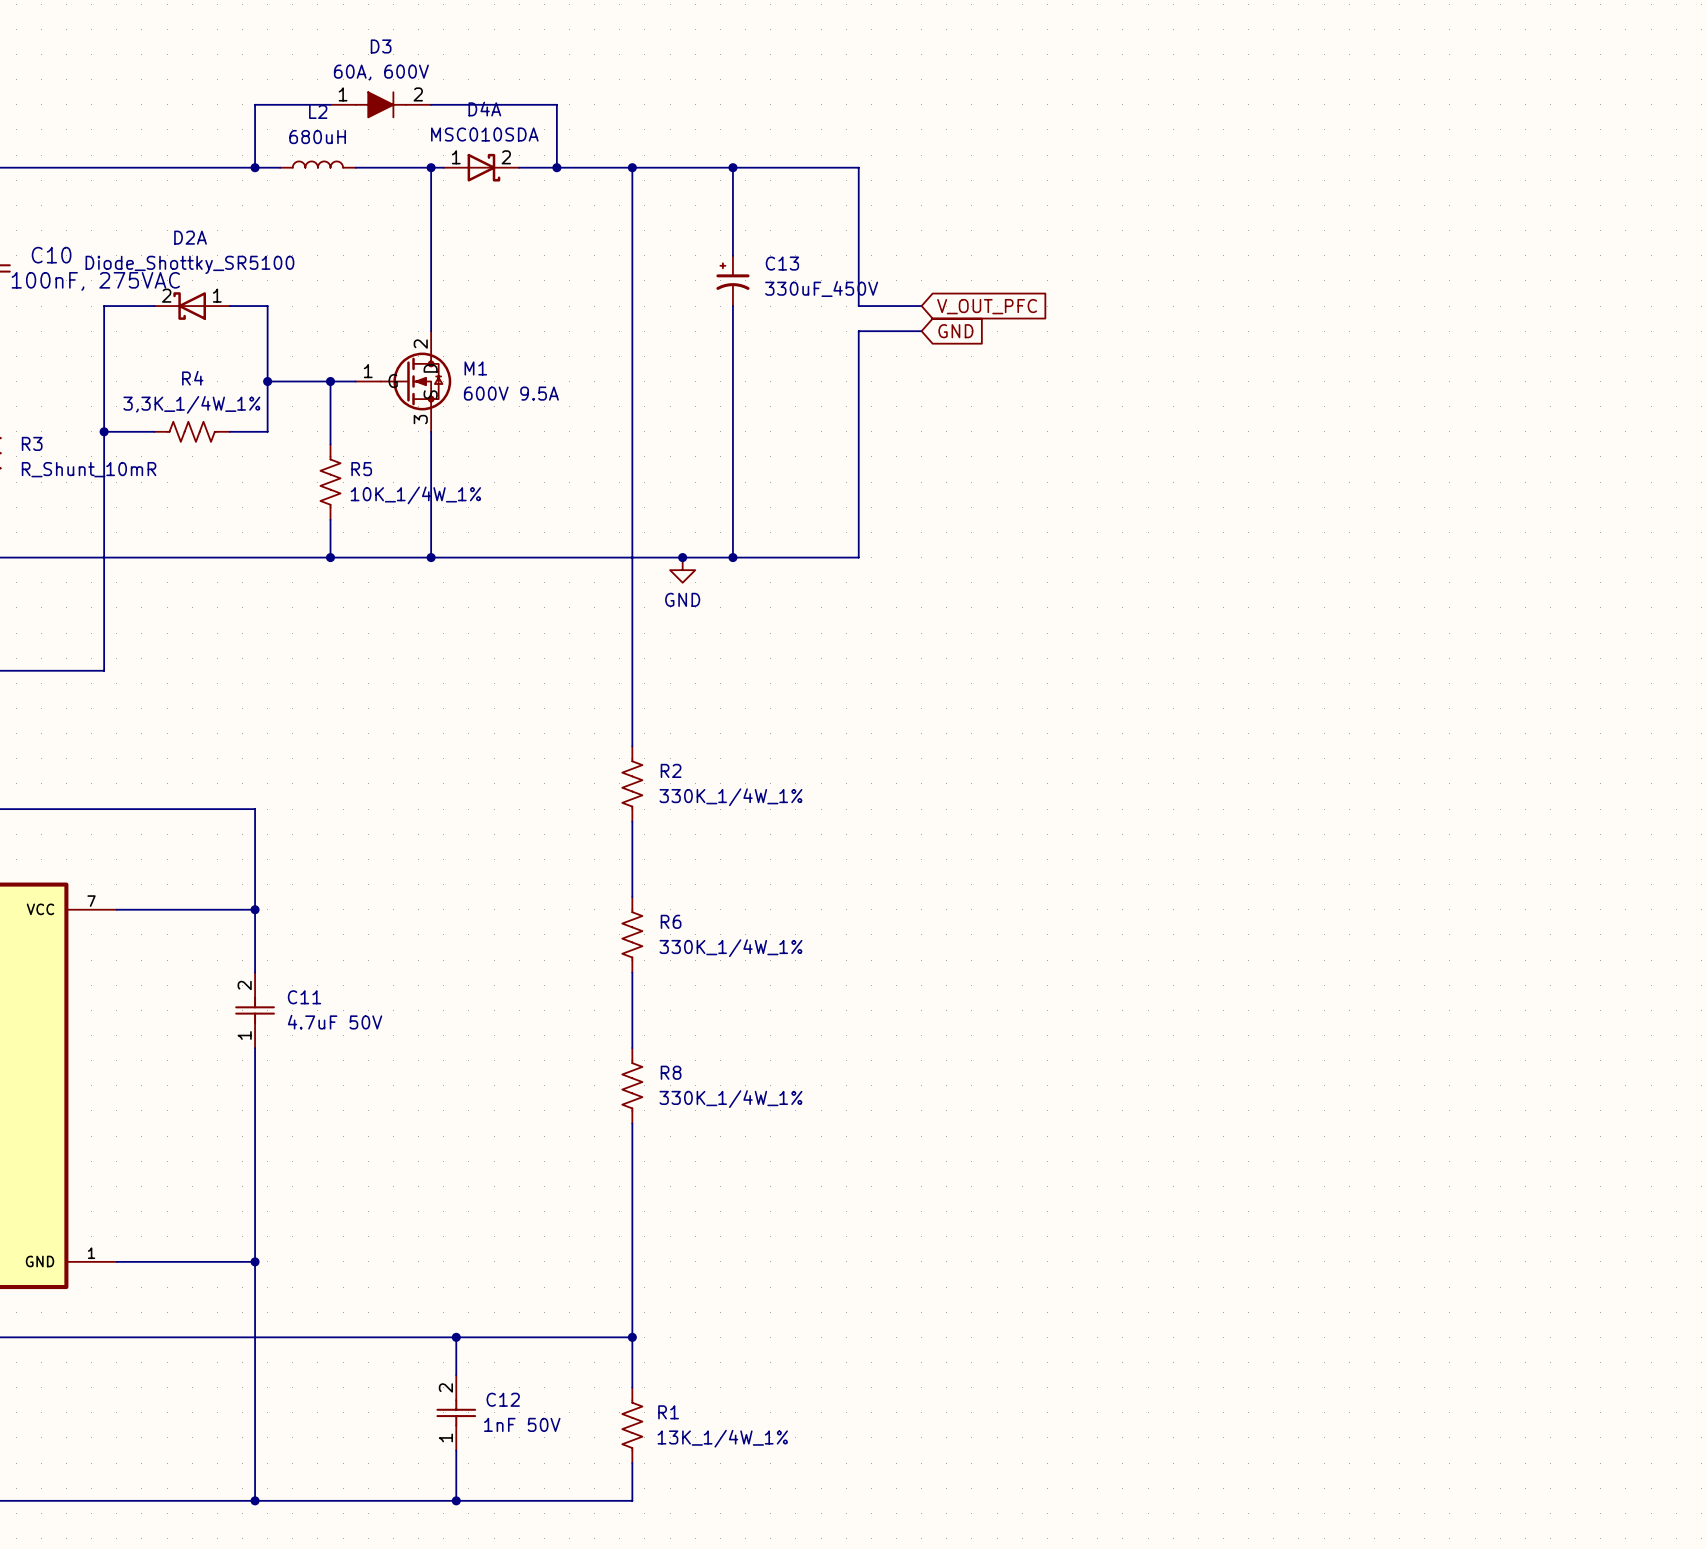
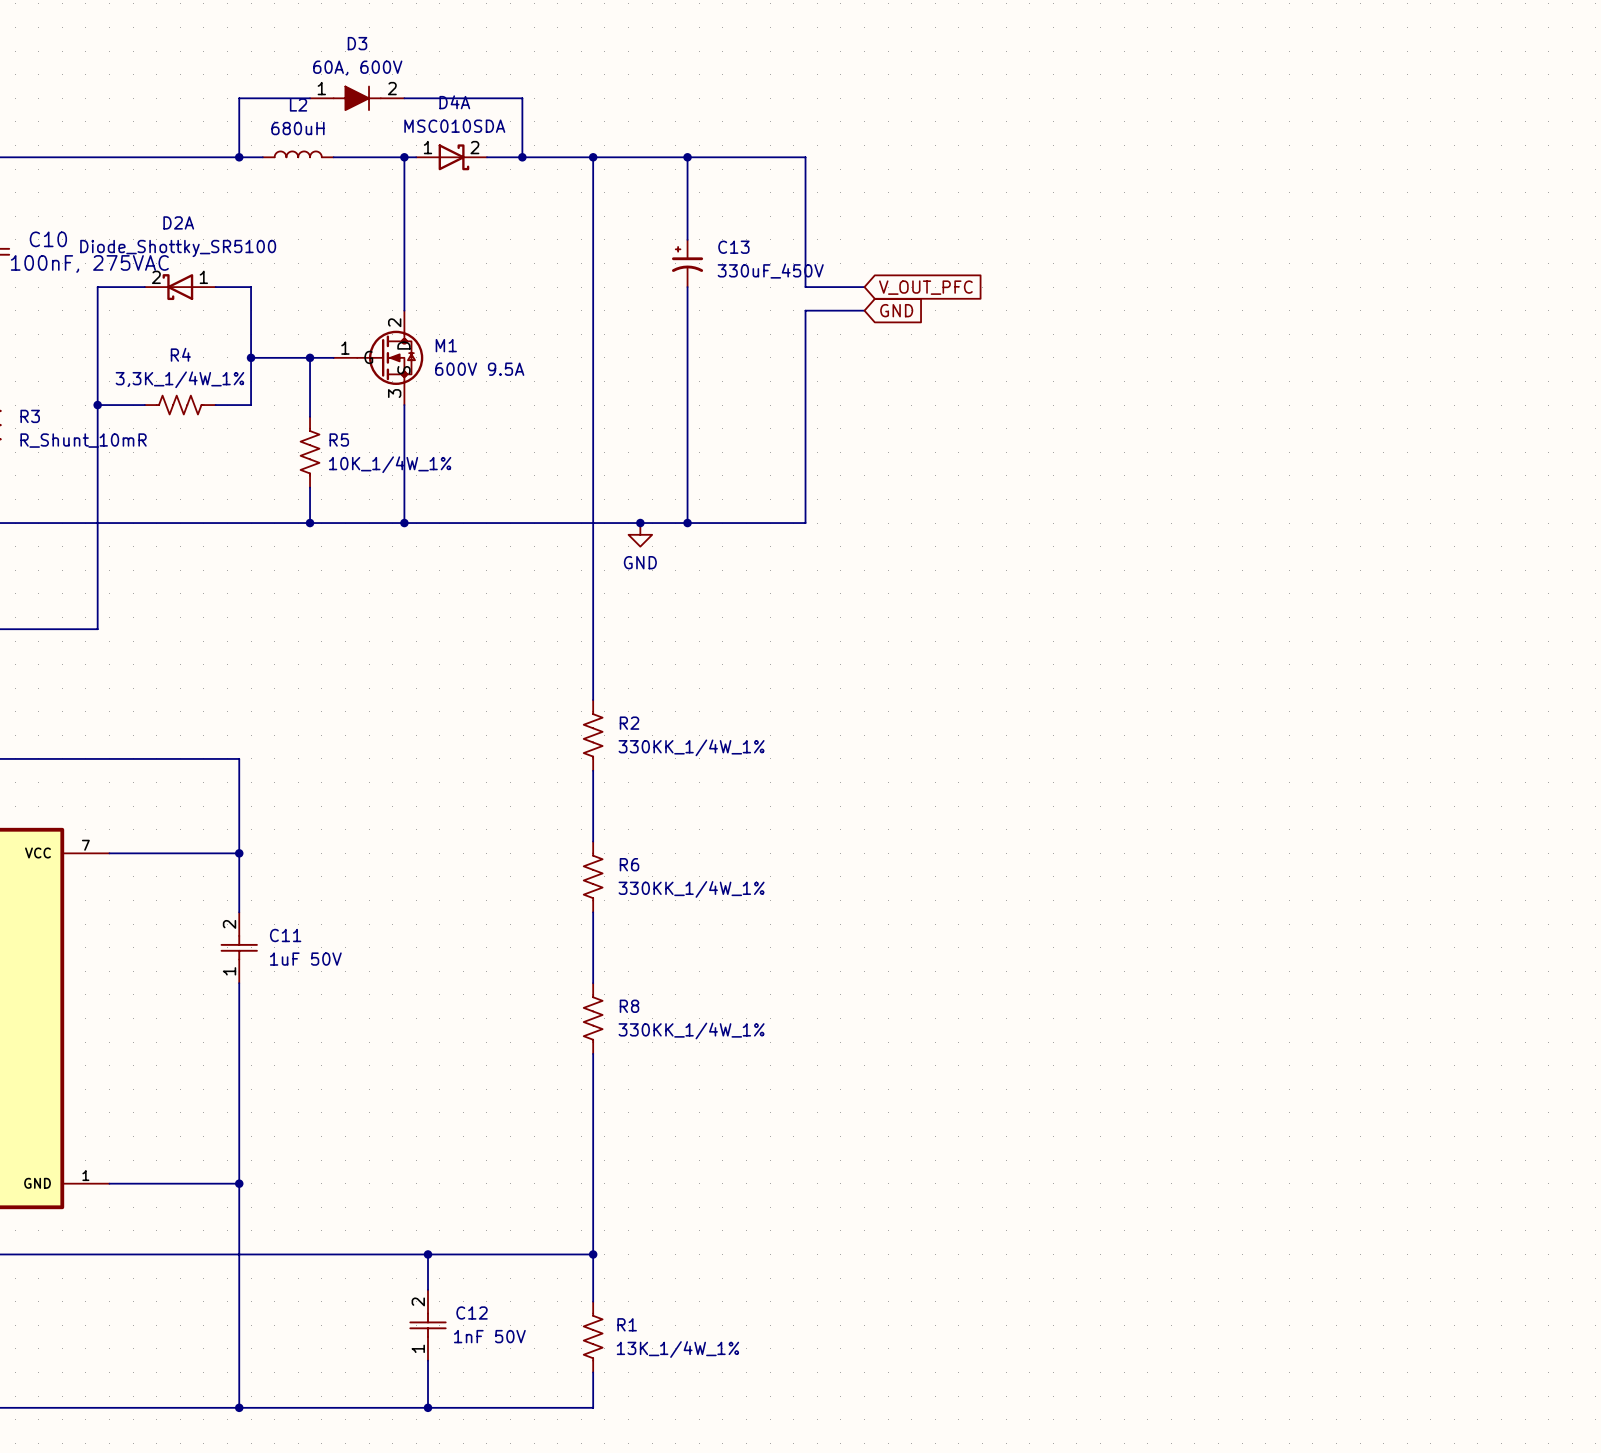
R2 value: 330K_1/4W_1% (730, 797) -> 330KK_1/4W_1% (691, 747)
R6 value: 330K_1/4W_1% (730, 948) -> 330KK_1/4W_1% (691, 889)
C11 value: 4.7uF 50V (335, 1022) -> 1uF 50V (305, 959)
R8 value: 330K_1/4W_1% (730, 1099) -> 330KK_1/4W_1% (691, 1030)

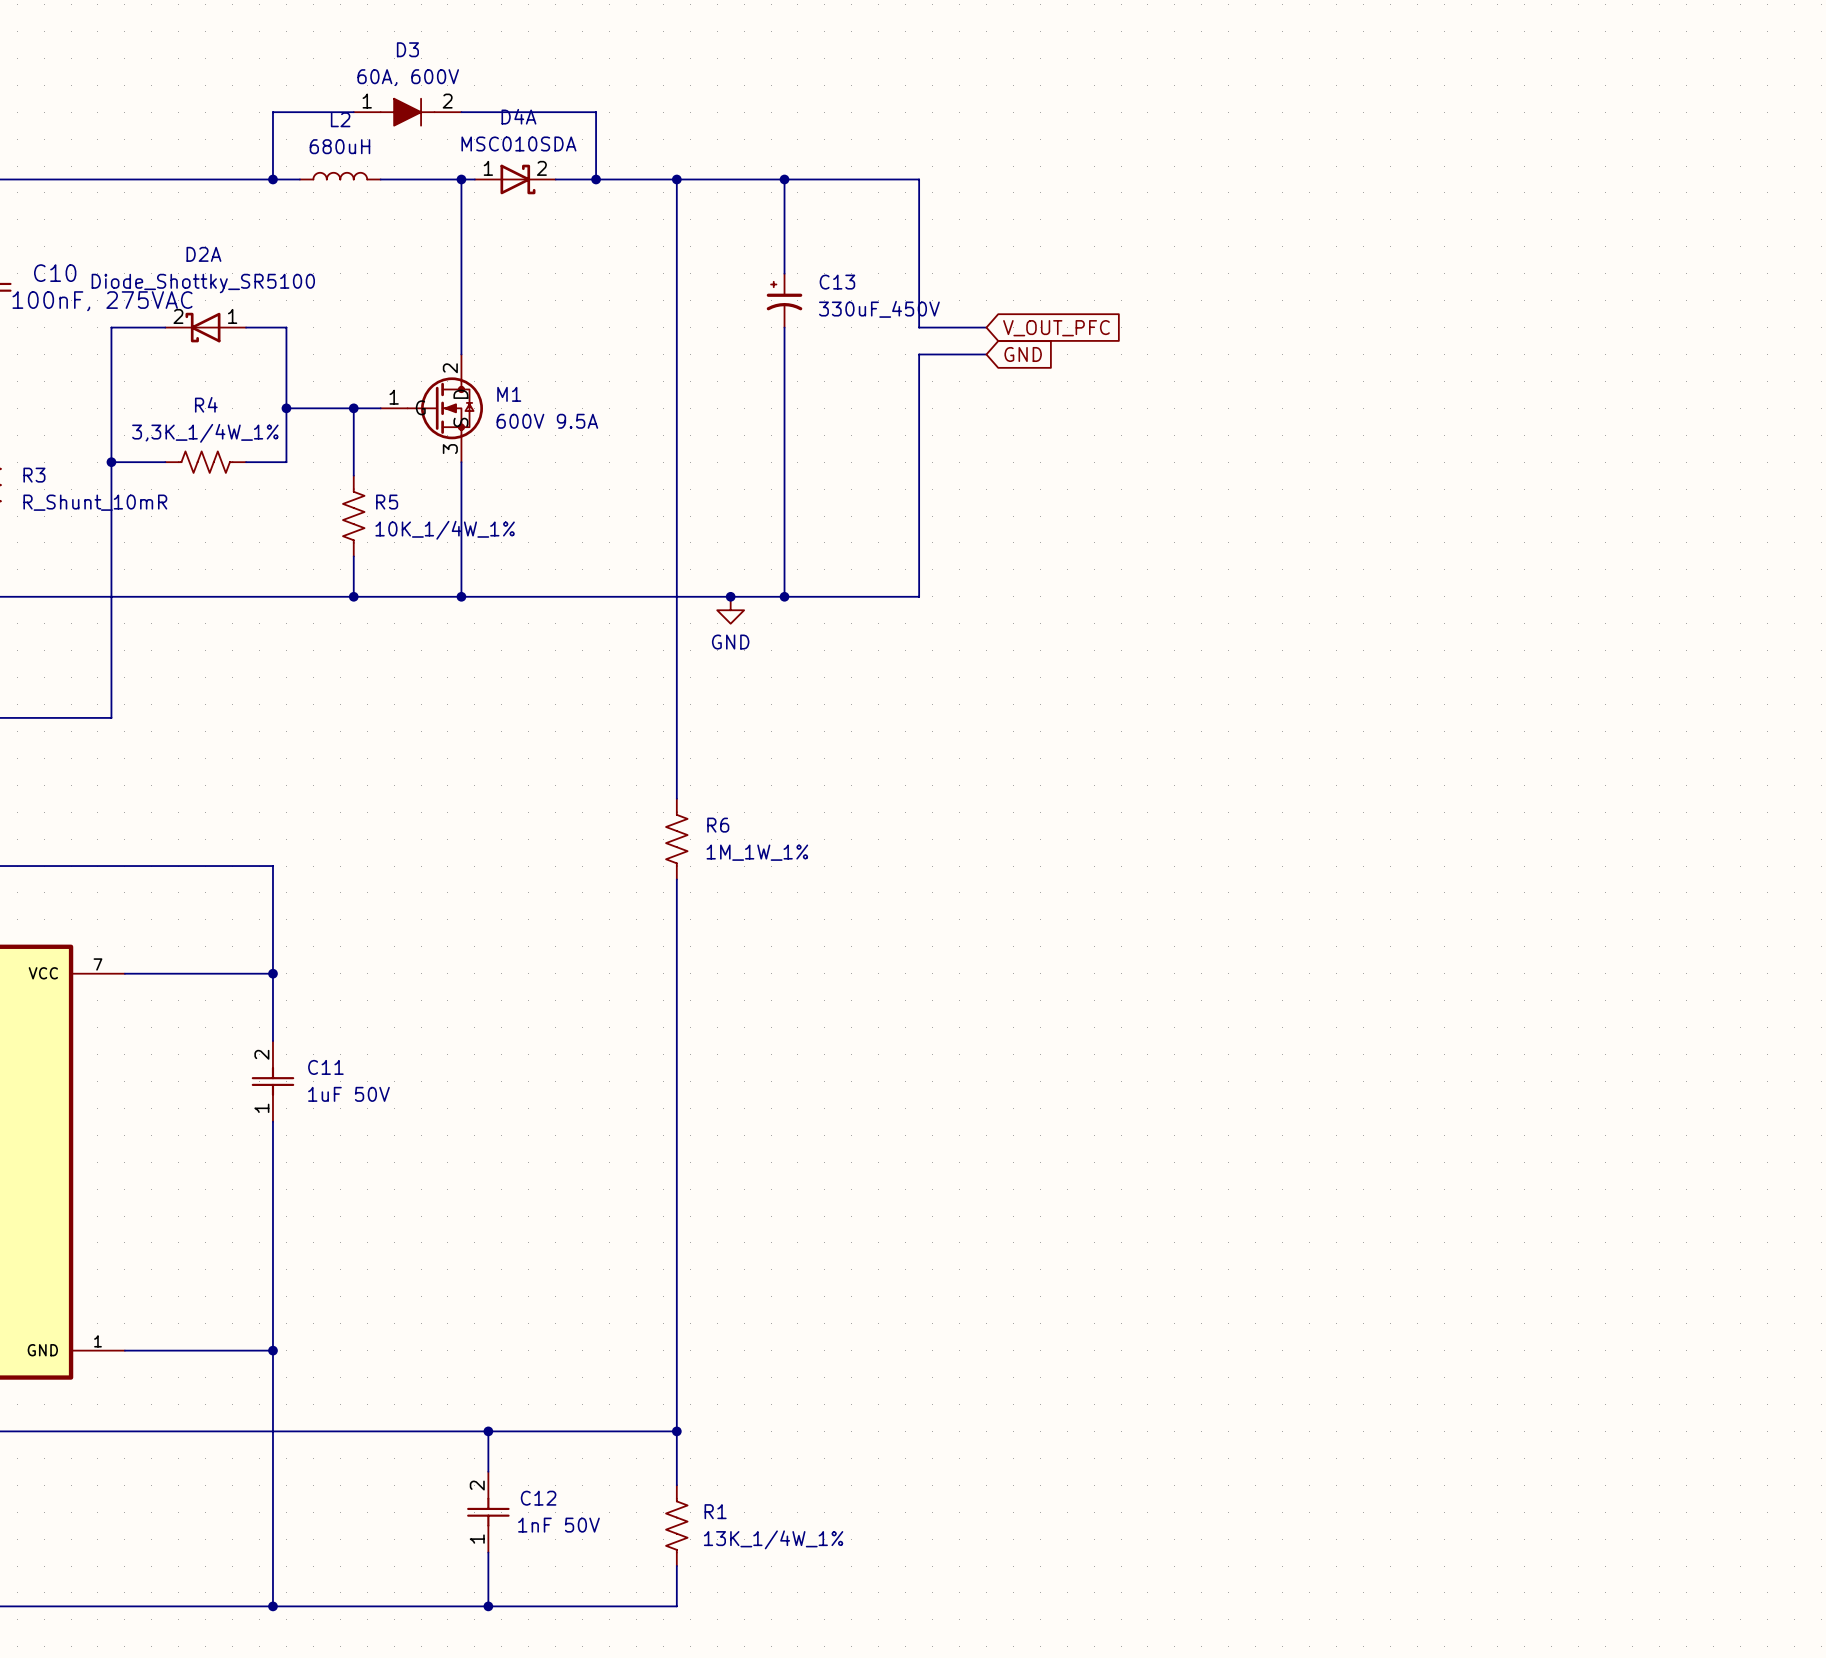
R2 name: R2 (629, 723) -> R6 (718, 825)
R2 value: 330KK_1/4W_1% (691, 747) -> 1M_1W_1% (757, 852)
R6: 330KK_1/4W_1% (593, 876) -> none
R8: 330KK_1/4W_1% (593, 1018) -> none

